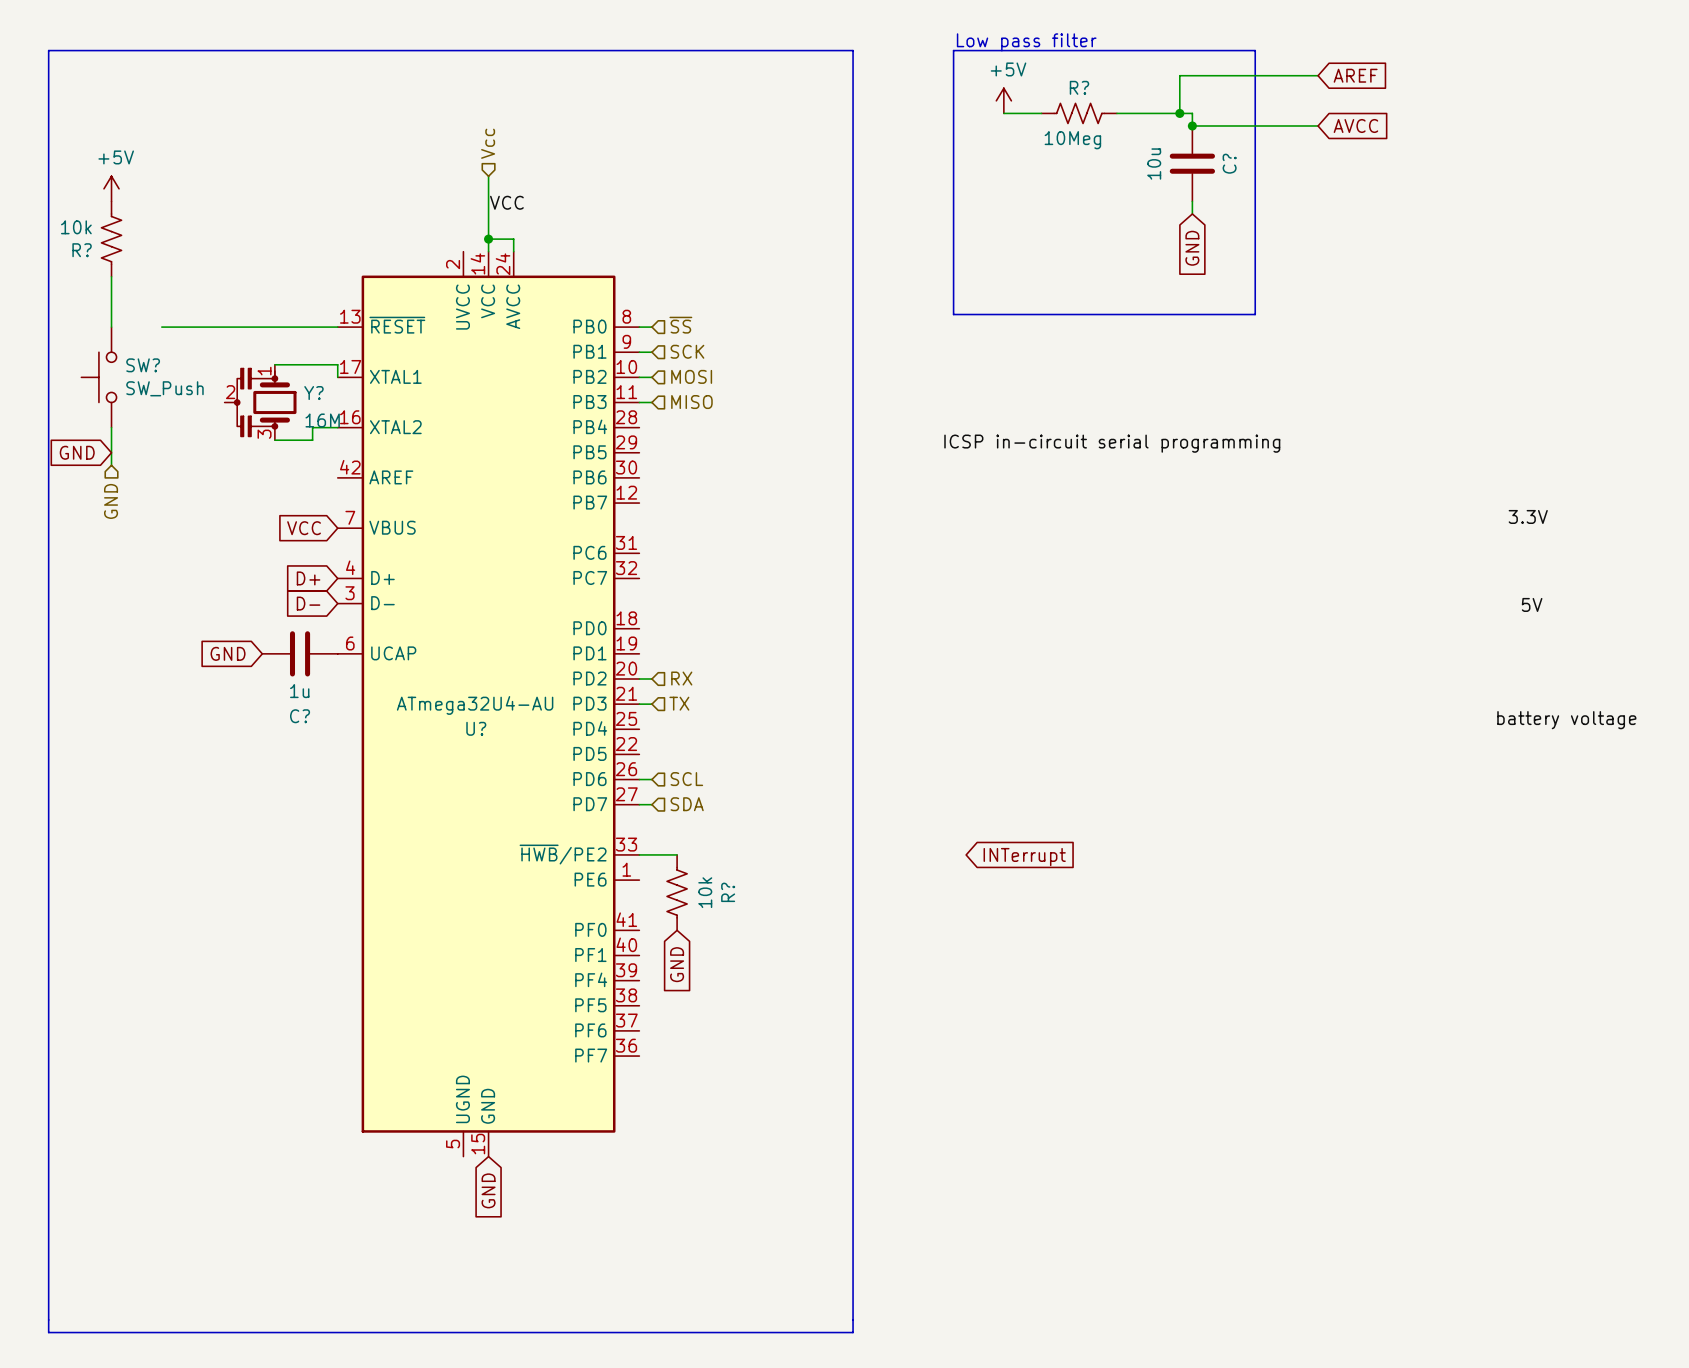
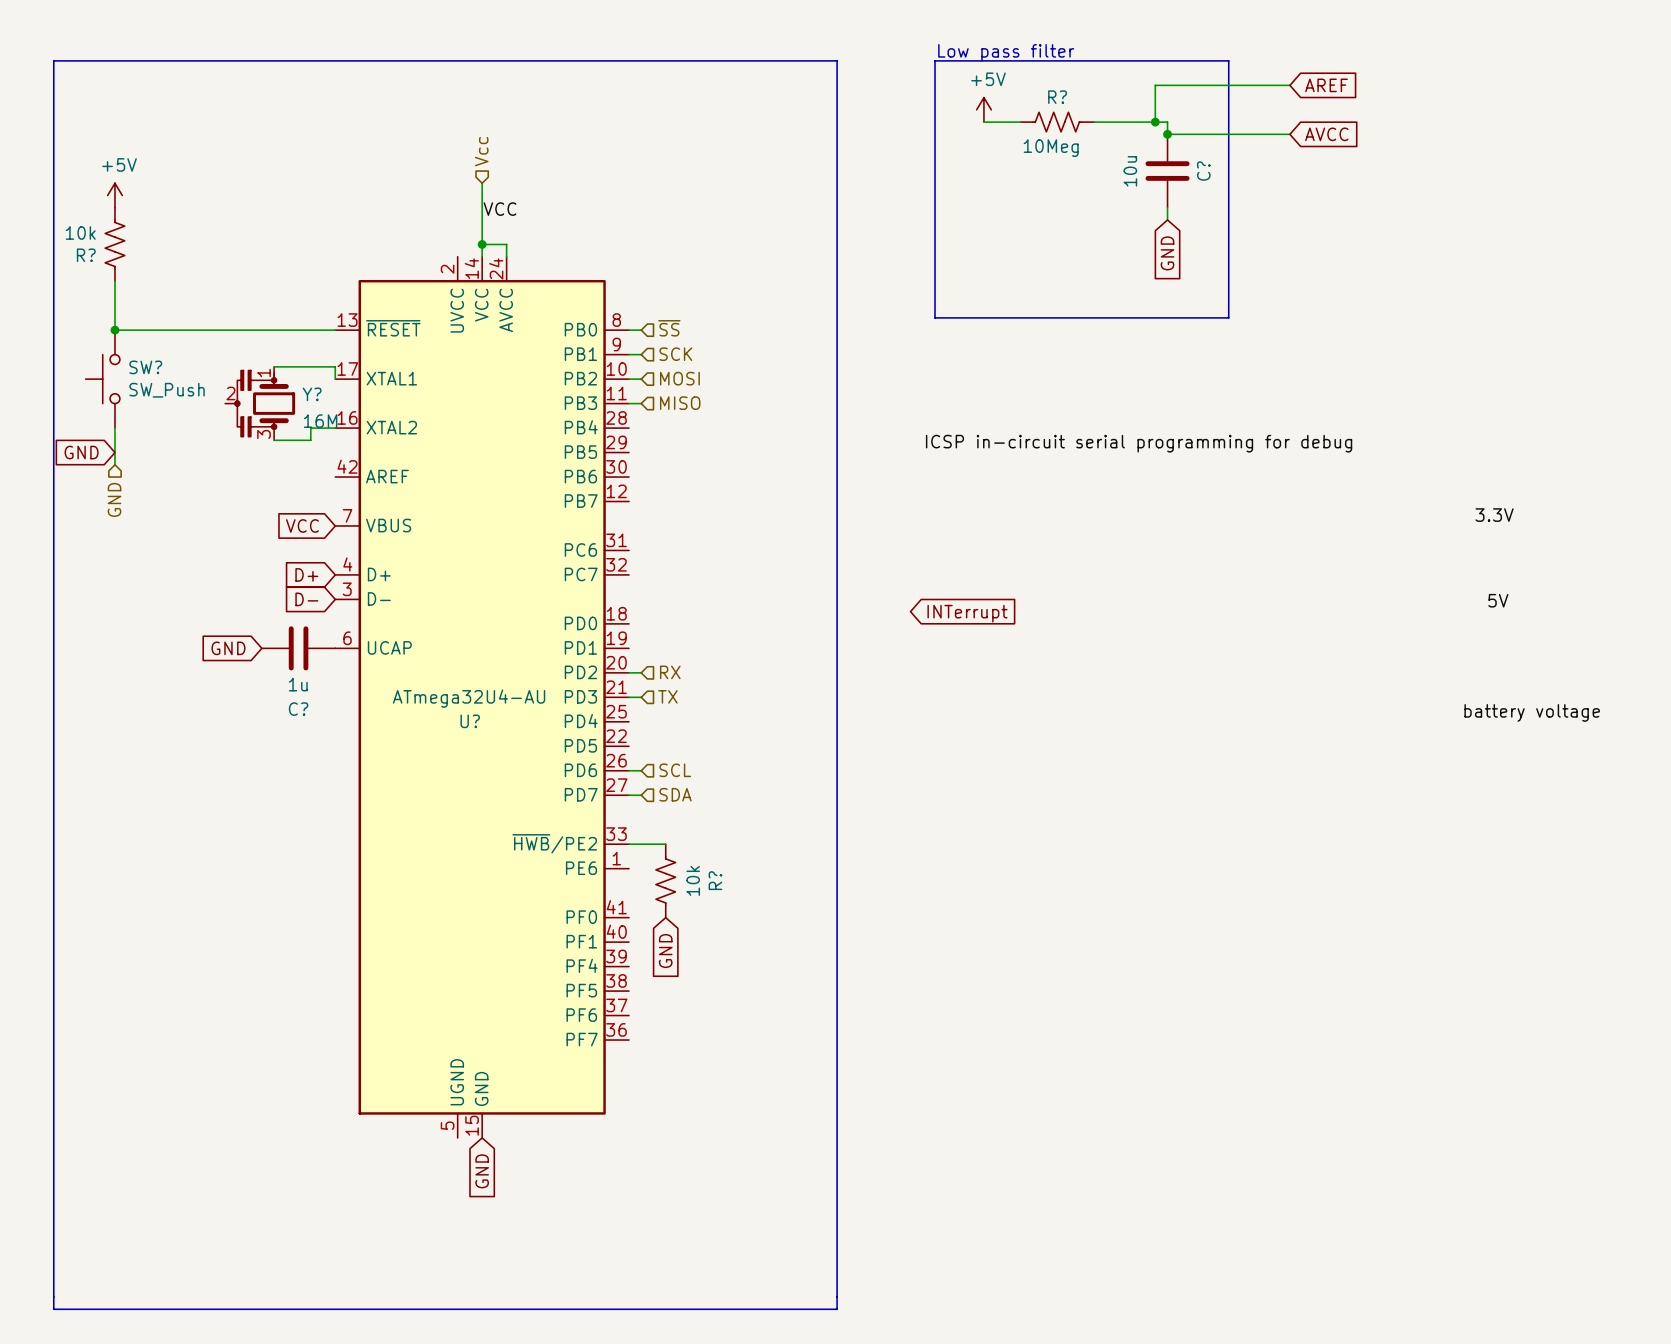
wire: none -> (114, 330) (163, 330)
junction: none -> (114, 330)
label: ICSP in-circuit serial programming (1112, 443) -> ICSP in-circuit serial programming for debug (1139, 443)
global label position: INTerrupt (1024, 857) -> INTerrupt (967, 613)

